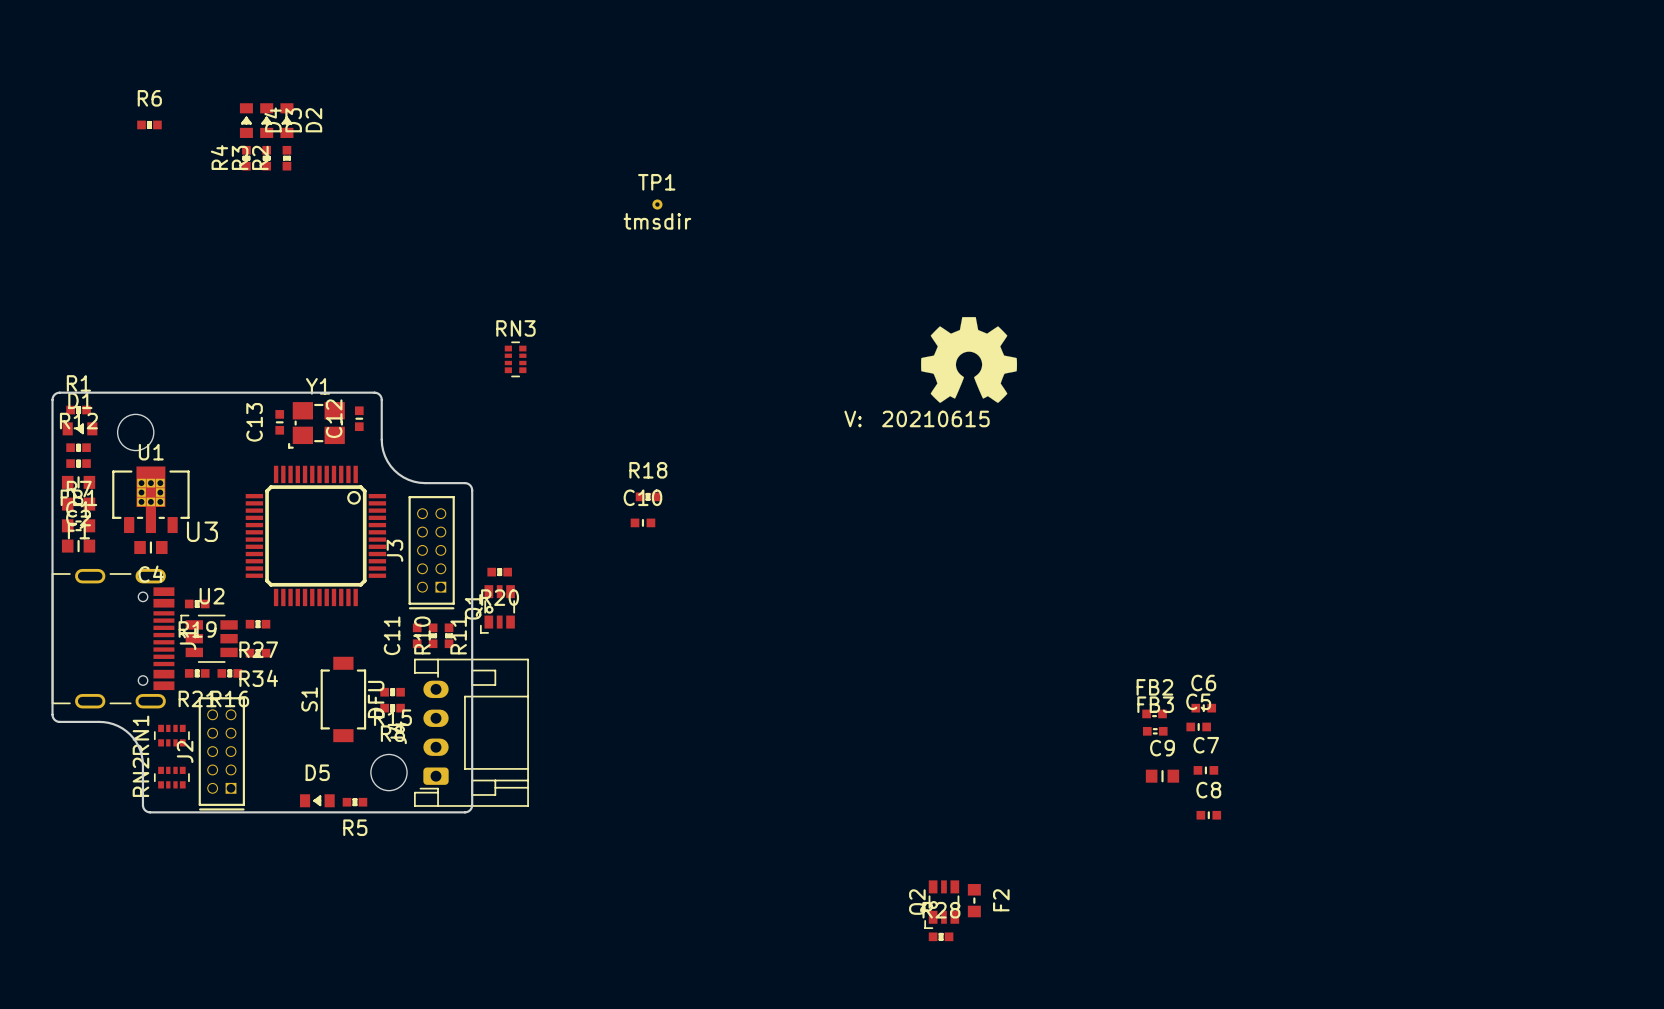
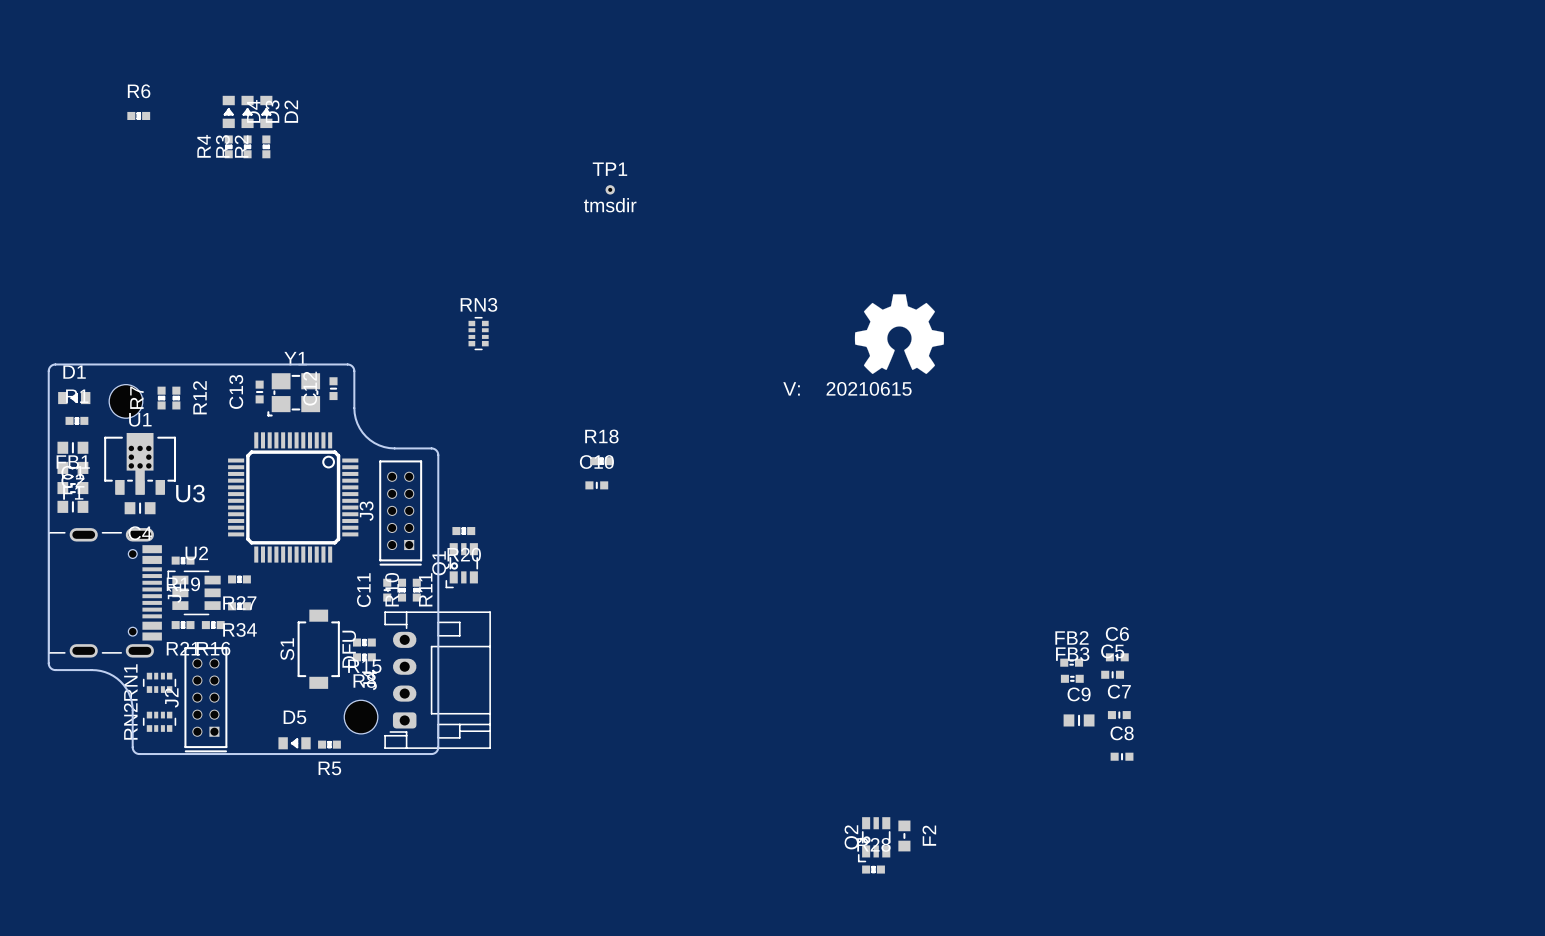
R1 position: (78, 410) -> (76, 420)
R12 rotation: 0° (78, 447) -> 90° clockwise (176, 398)
R12 position: (78, 447) -> (176, 398)
R7 rotation: 0° (78, 463) -> 90° clockwise (161, 398)
R7 position: (78, 463) -> (161, 398)

